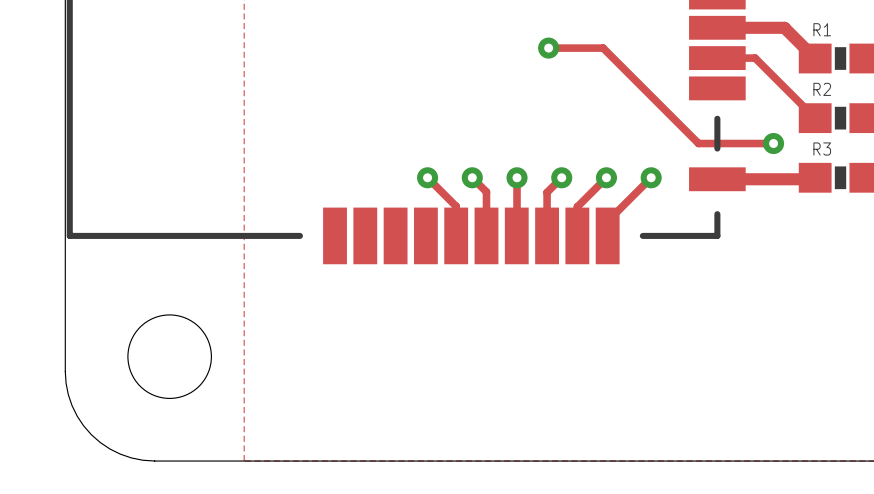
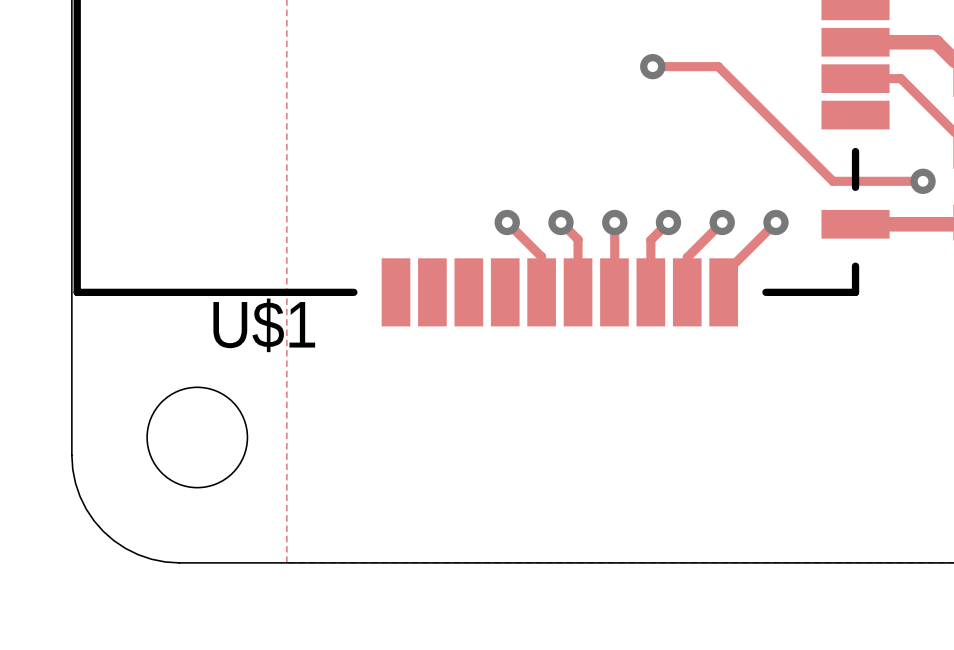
U$1 name: none -> U$1 (264, 325)

